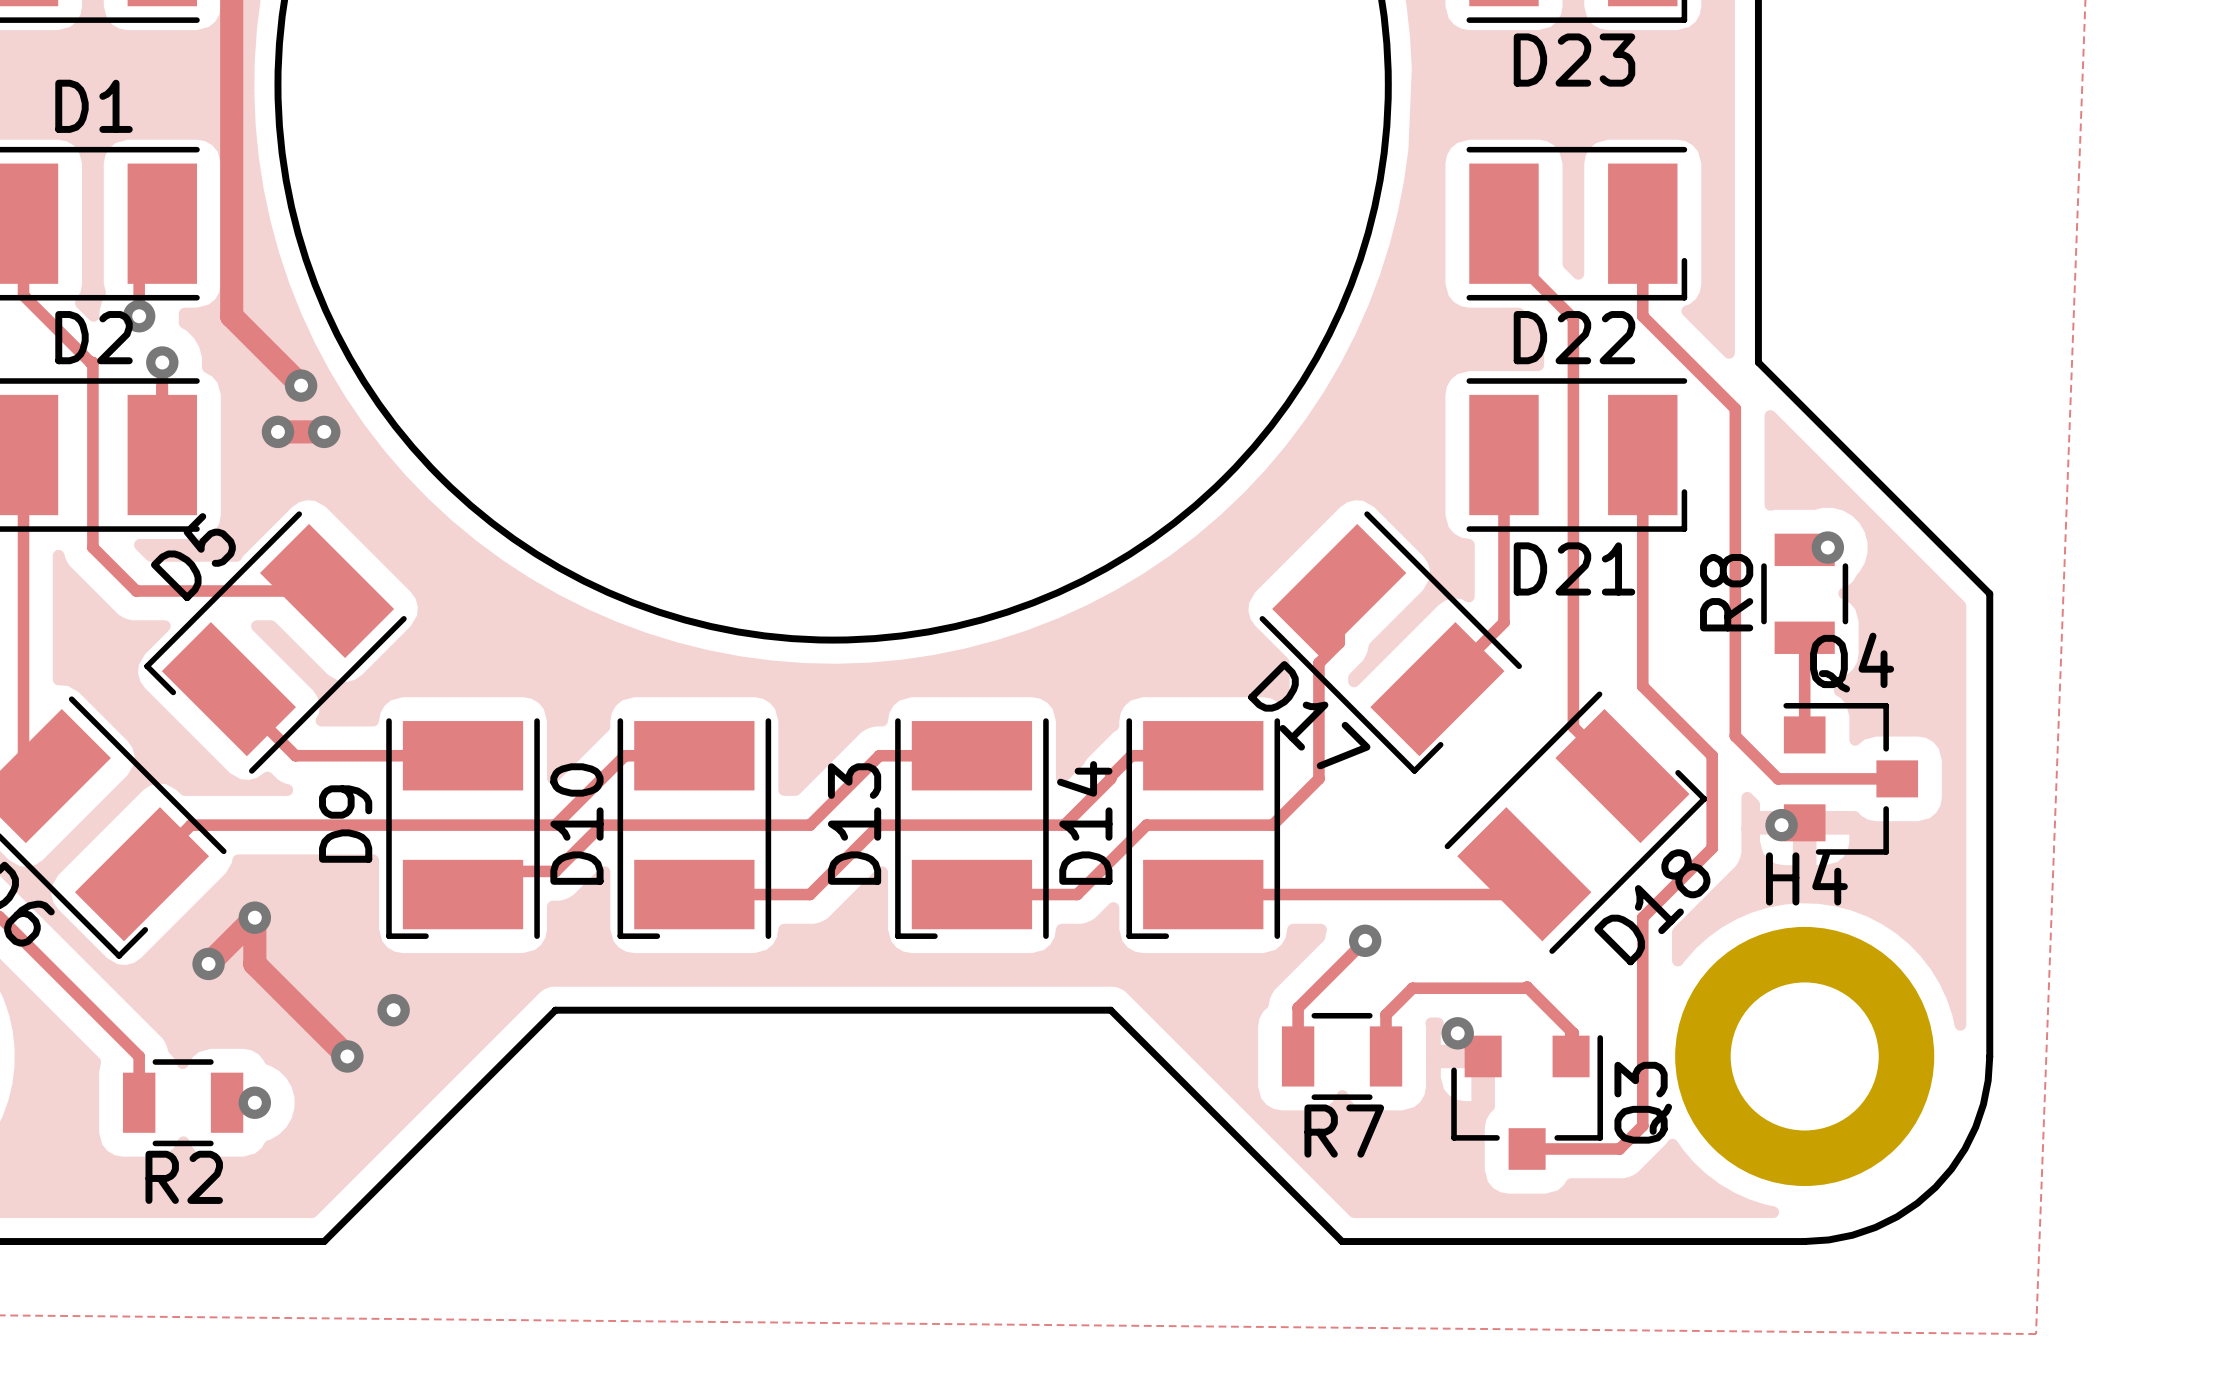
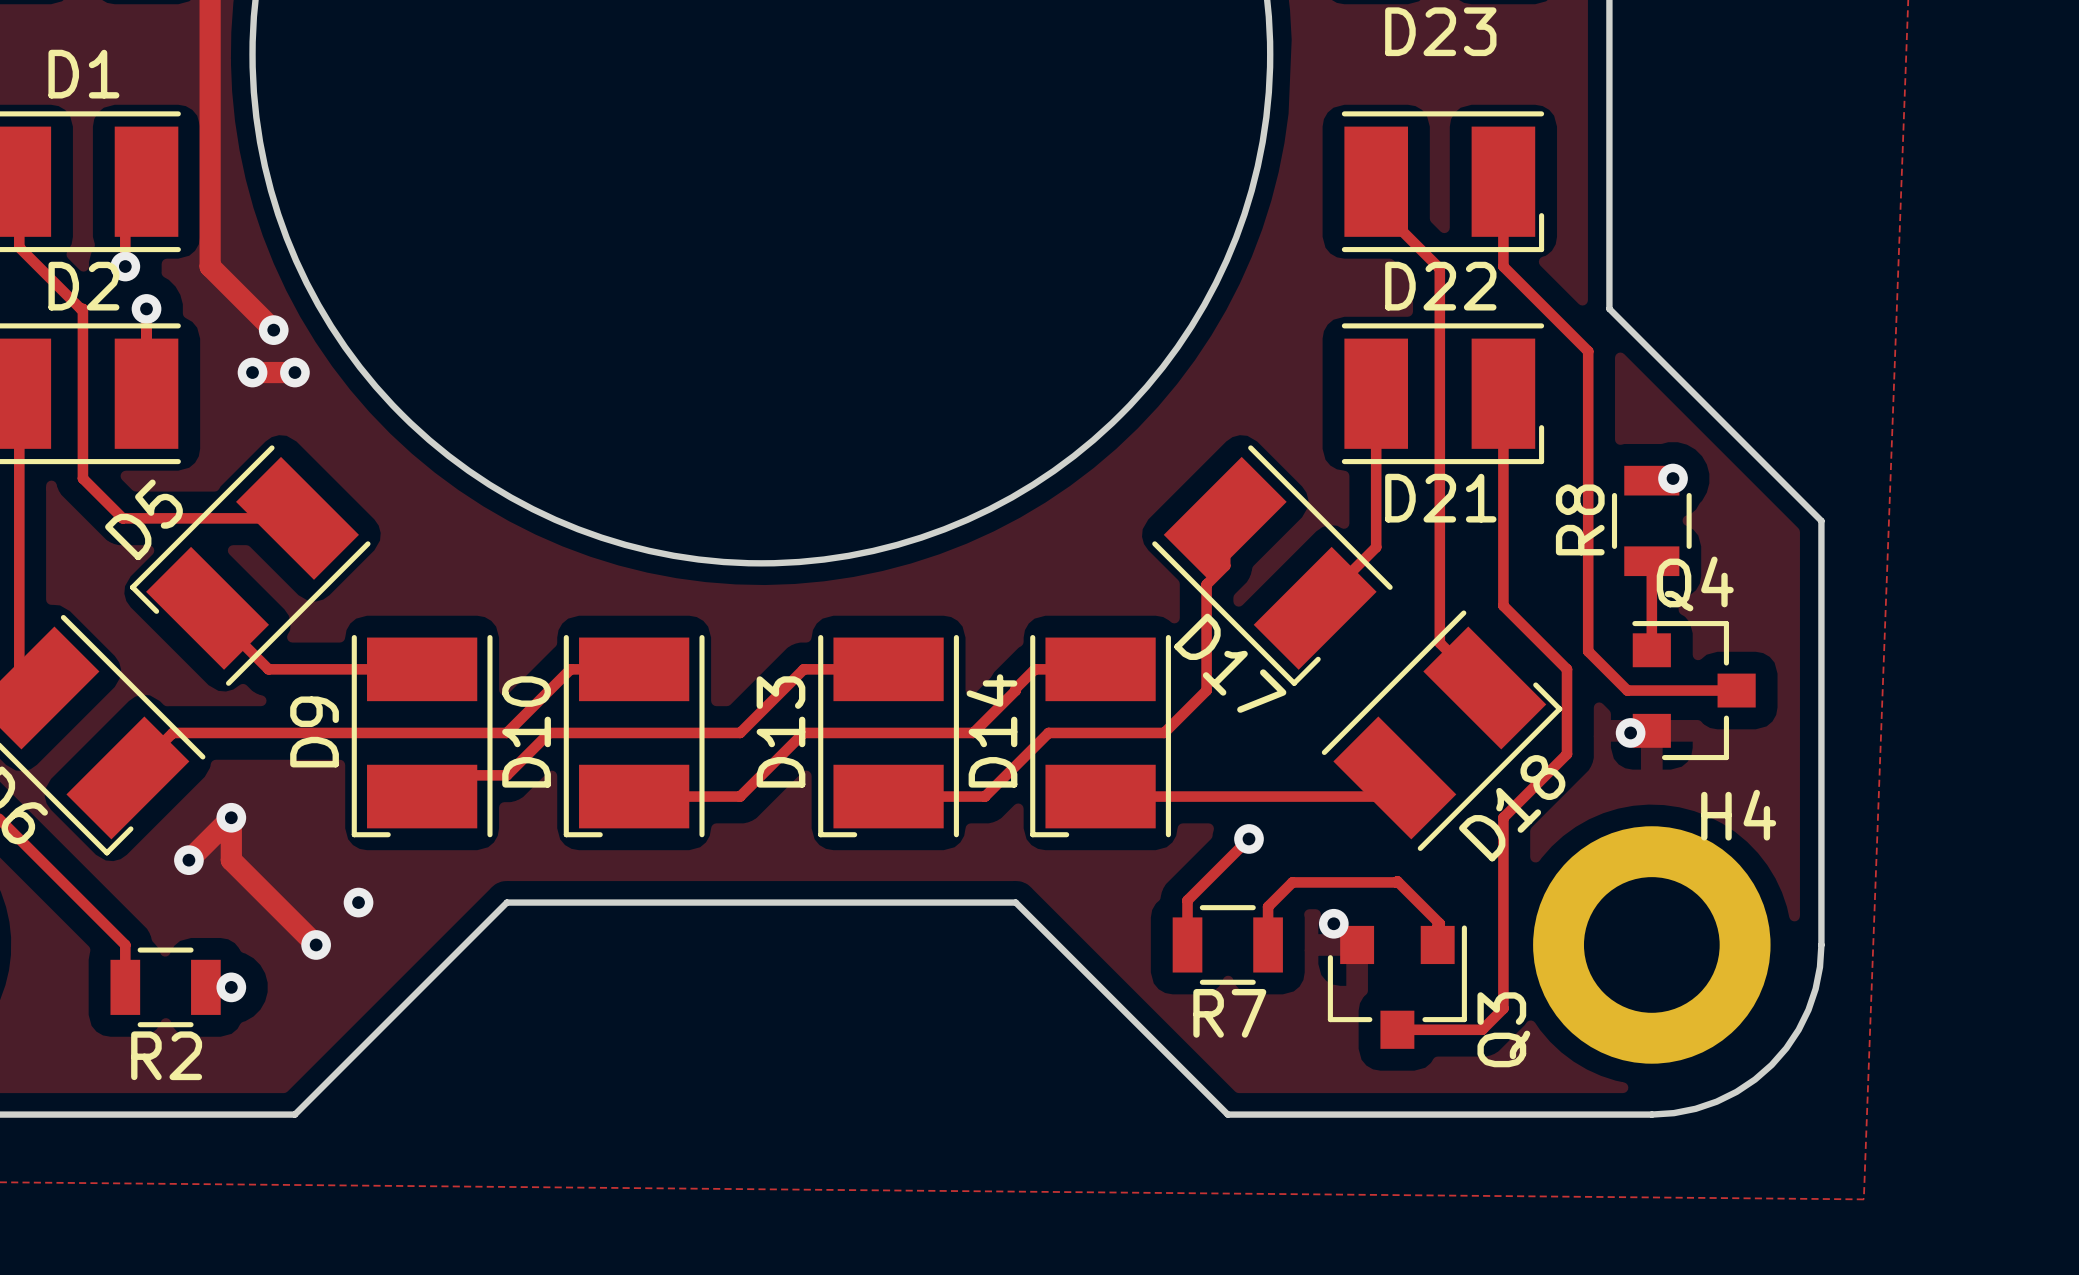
D5 name position: D5 (193, 557) -> D5 (143, 519)
D17 name position: D17 (1309, 715) -> D17 (1230, 663)
H4 name position: H4 (1806, 877) -> H4 (1738, 815)
Q3 name position: Q3 (1643, 1102) -> Q3 (1503, 1029)

